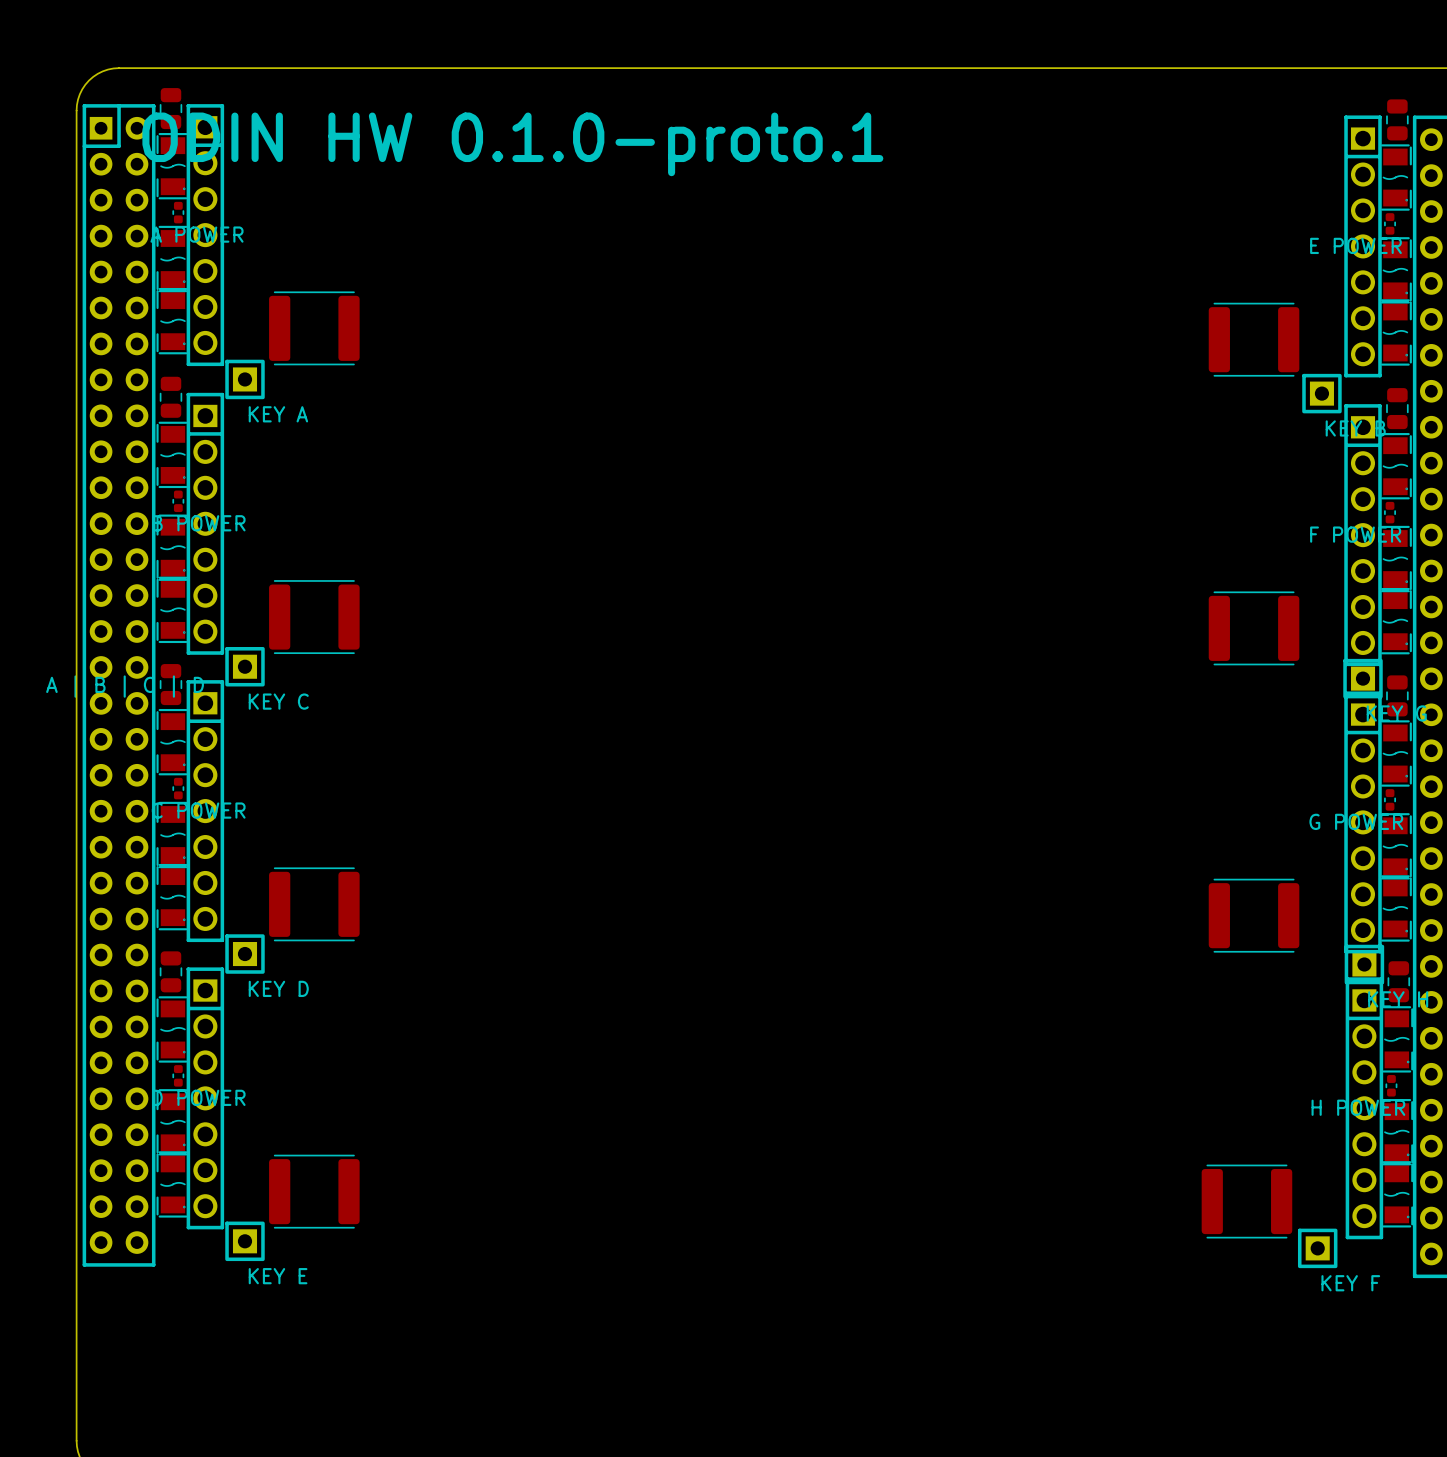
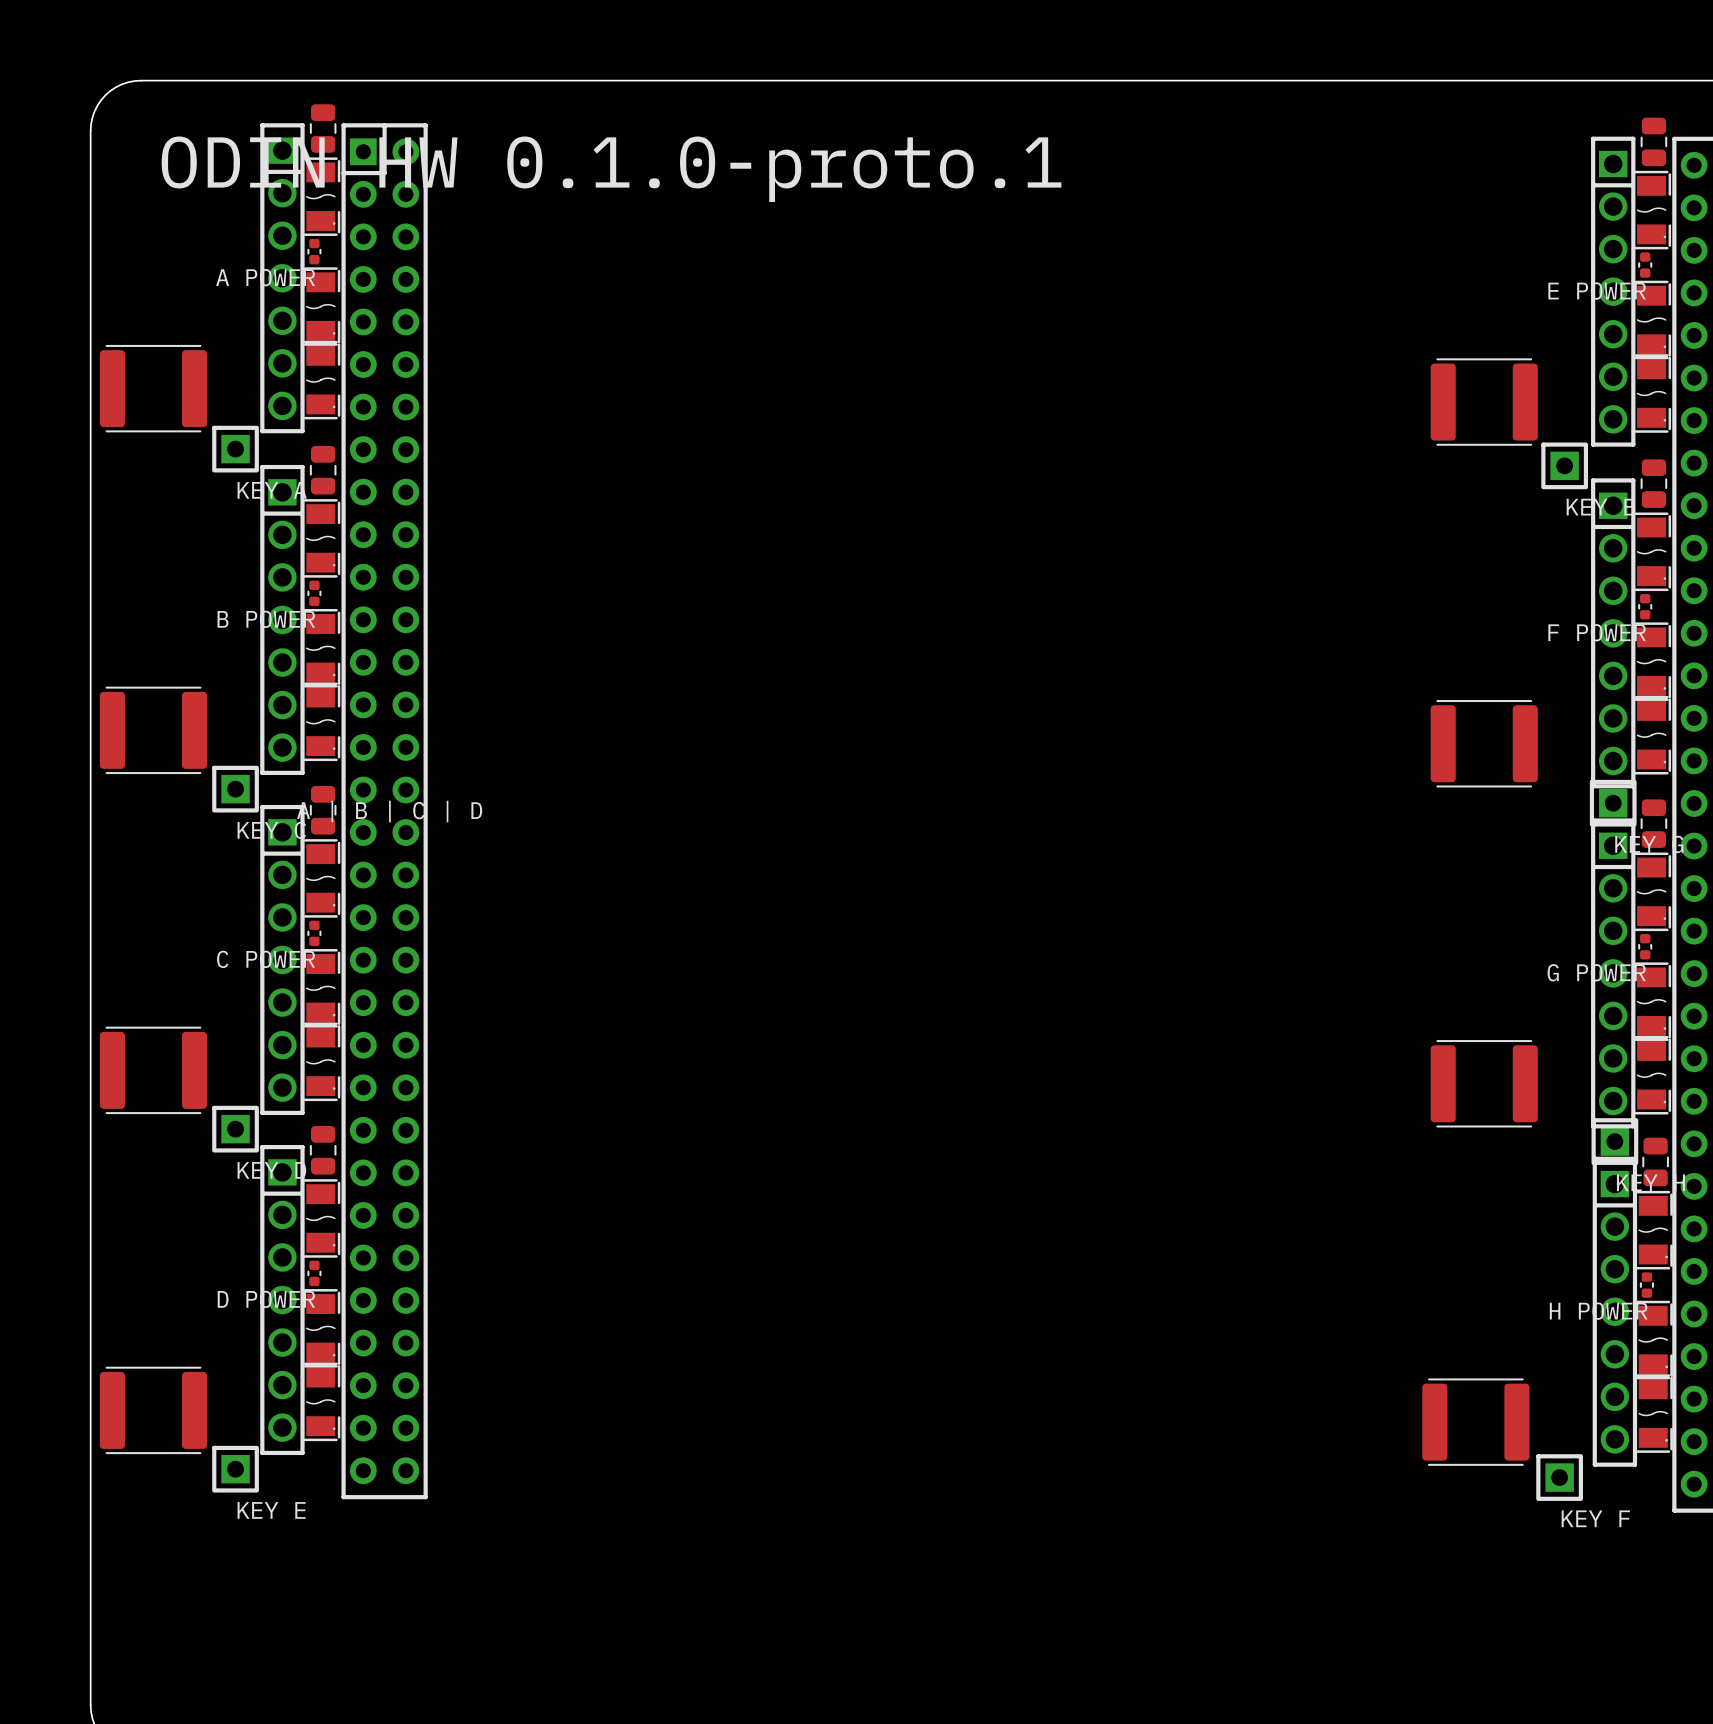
part position: (170, 108) -> (323, 128)
part: (172, 166) -> none
part: none -> (320, 196)
part position: (178, 212) -> (314, 251)
part position: (205, 235) -> (282, 278)
part: (172, 259) -> none
part: none -> (320, 306)
part: (172, 321) -> none
part: none -> (320, 380)
part: none -> (153, 388)
part: (314, 328) -> none
part position: (245, 379) -> (235, 449)
part position: (170, 397) -> (323, 470)
part: (172, 454) -> none
part: none -> (320, 538)
part position: (178, 501) -> (314, 593)
part position: (205, 523) -> (282, 619)
part: (172, 547) -> none
part: none -> (320, 648)
part: (172, 609) -> none
part: none -> (320, 721)
part: none -> (153, 730)
part: (314, 617) -> none
part position: (245, 666) -> (235, 789)
part position: (170, 684) -> (323, 810)
part position: (119, 685) -> (384, 811)
part: (172, 742) -> none
part: none -> (320, 878)
part position: (178, 788) -> (314, 933)
part position: (205, 811) -> (282, 959)
part: (172, 835) -> none
part: none -> (320, 988)
part: (172, 897) -> none
part: none -> (320, 1061)
part: none -> (153, 1070)
part: (314, 904) -> none
part position: (245, 954) -> (235, 1129)
part position: (170, 971) -> (323, 1150)
part: (172, 1029) -> none
part: none -> (320, 1218)
part position: (178, 1075) -> (314, 1273)
part position: (205, 1098) -> (282, 1300)
part: (172, 1122) -> none
part: none -> (320, 1328)
part: (172, 1184) -> none
part: none -> (320, 1401)
part: none -> (153, 1410)
part: (314, 1191) -> none
part position: (245, 1241) -> (235, 1469)

